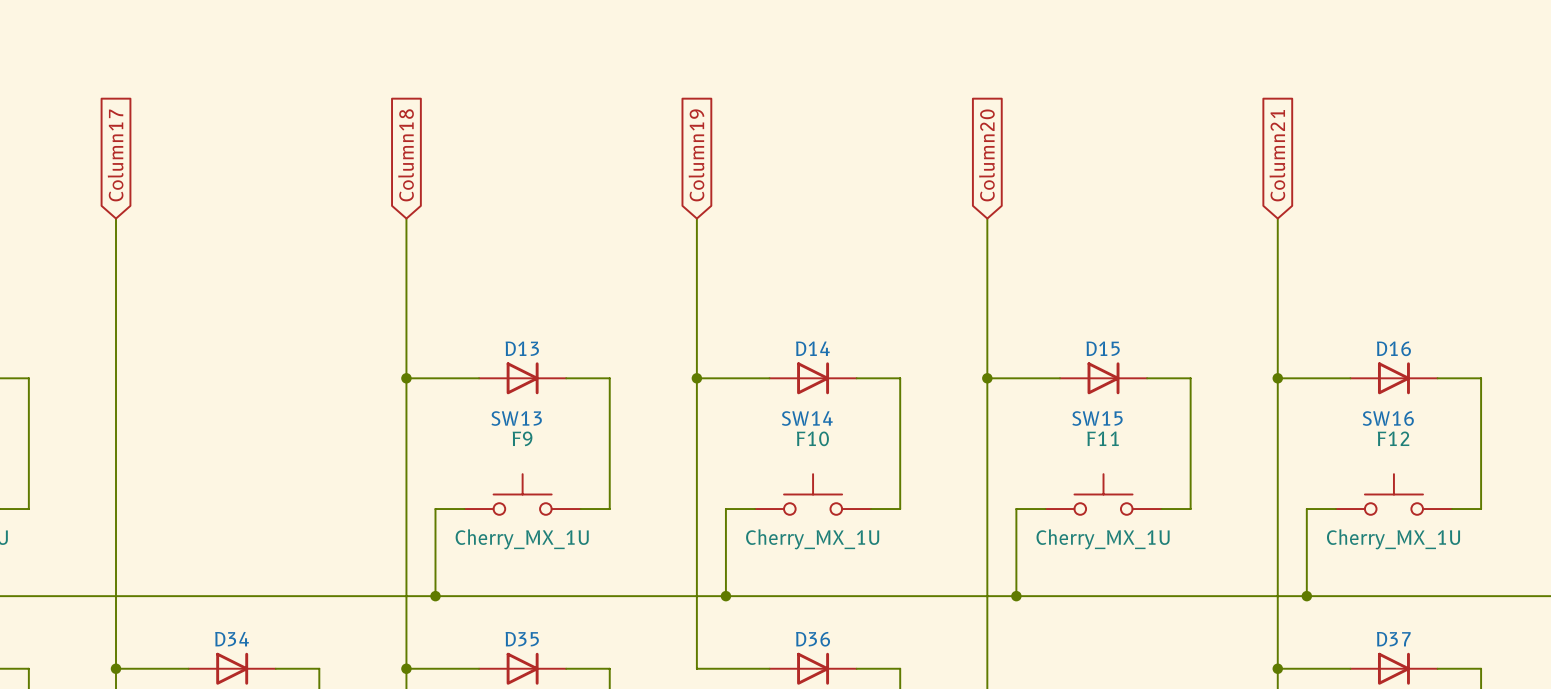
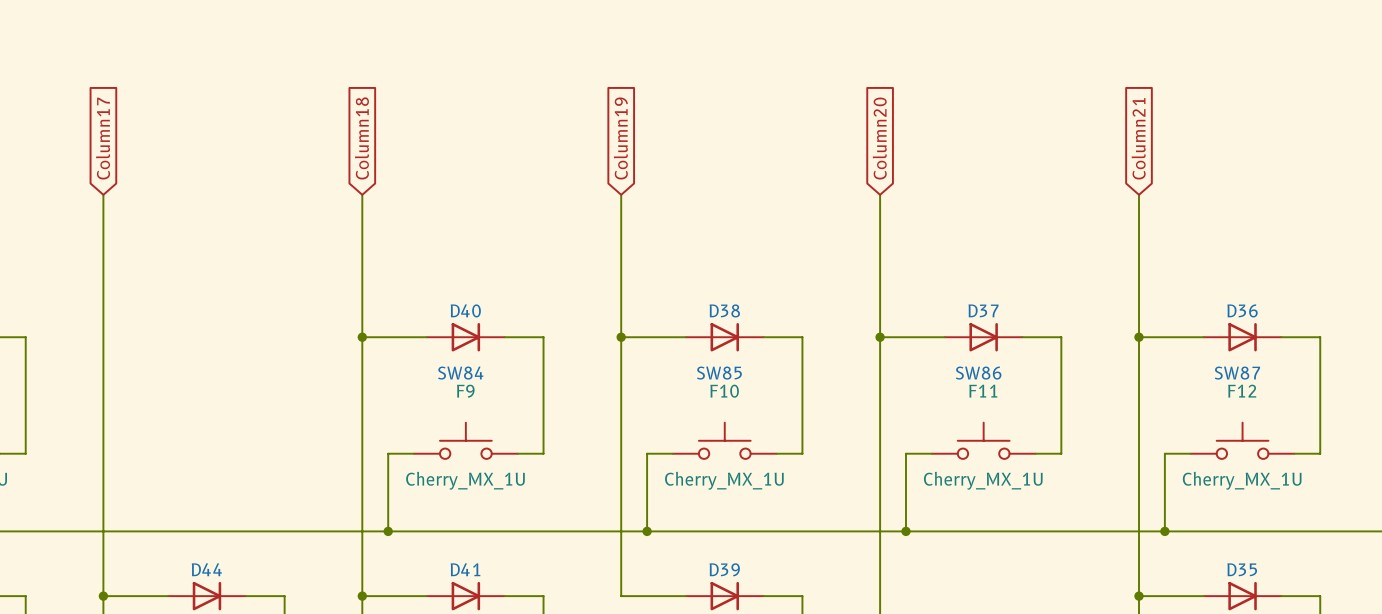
D13 name: D13 (522, 348) -> D40 (465, 310)
D14 name: D14 (812, 348) -> D38 (724, 310)
D15 name: D15 (1103, 348) -> D37 (983, 310)
D16 name: D16 (1393, 348) -> D36 (1242, 310)
SW13 name: SW13 (516, 418) -> SW84 (460, 373)
SW14 name: SW14 (807, 418) -> SW85 (719, 373)
SW15 name: SW15 (1097, 418) -> SW86 (978, 373)
SW16 name: SW16 (1388, 418) -> SW87 (1237, 373)
D34 name: D34 (232, 639) -> D44 (206, 569)
D35 name: D35 (522, 639) -> D41 (465, 569)
D36 name: D36 (813, 639) -> D39 (724, 569)
D37 name: D37 (1393, 639) -> D35 (1242, 569)

